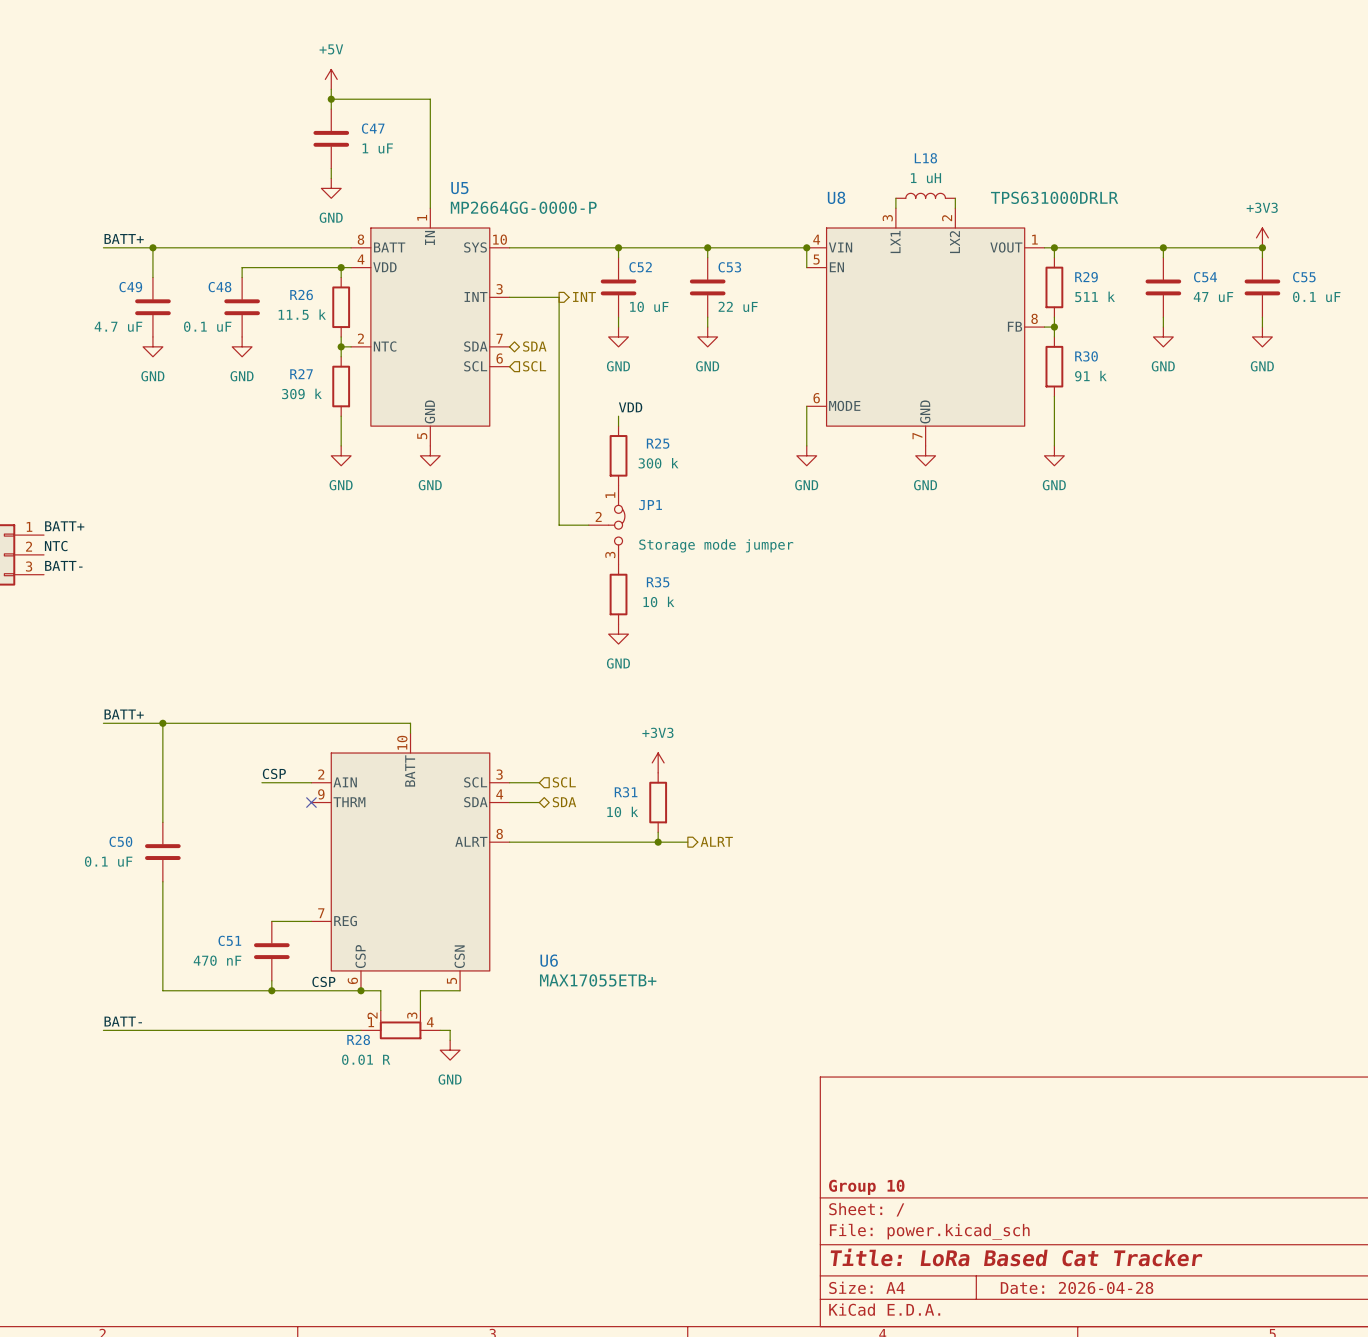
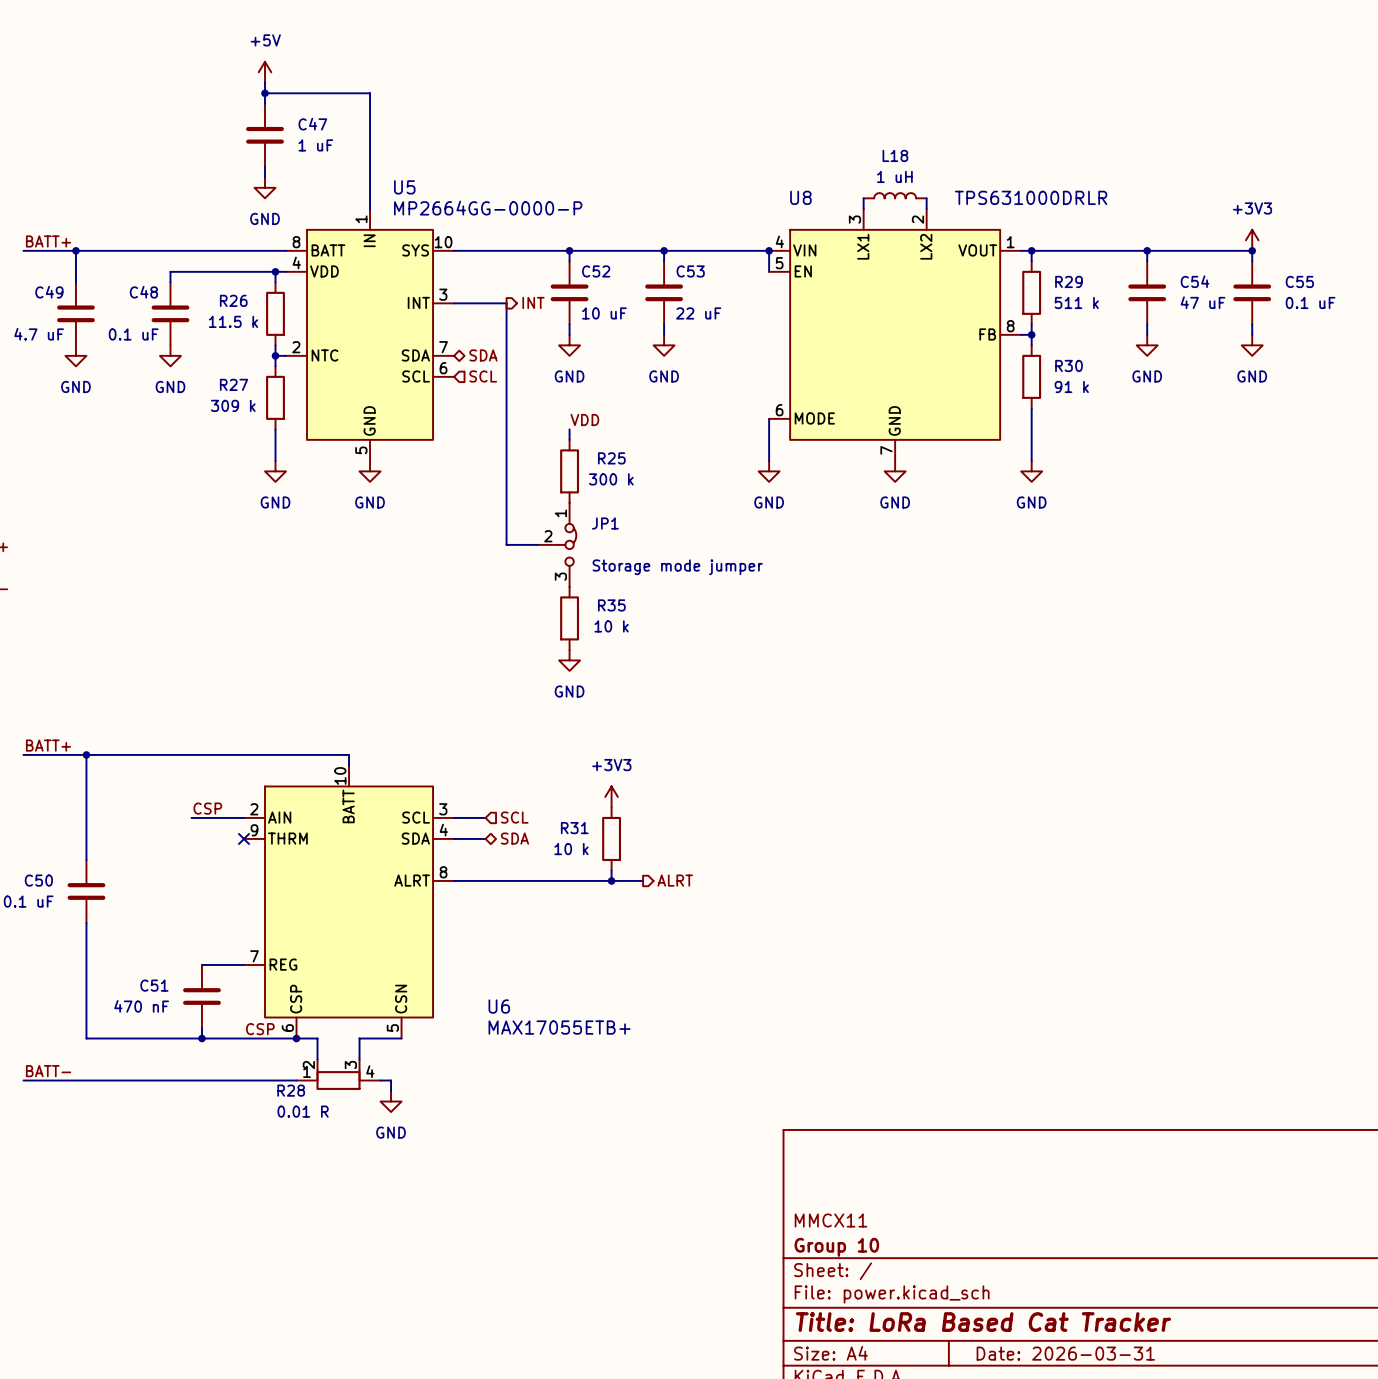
title block: none -> MMCX11 (830, 1220)
title block: Date: 2026-04-28 (1077, 1287) -> Date: 2026-03-31 (1065, 1353)

